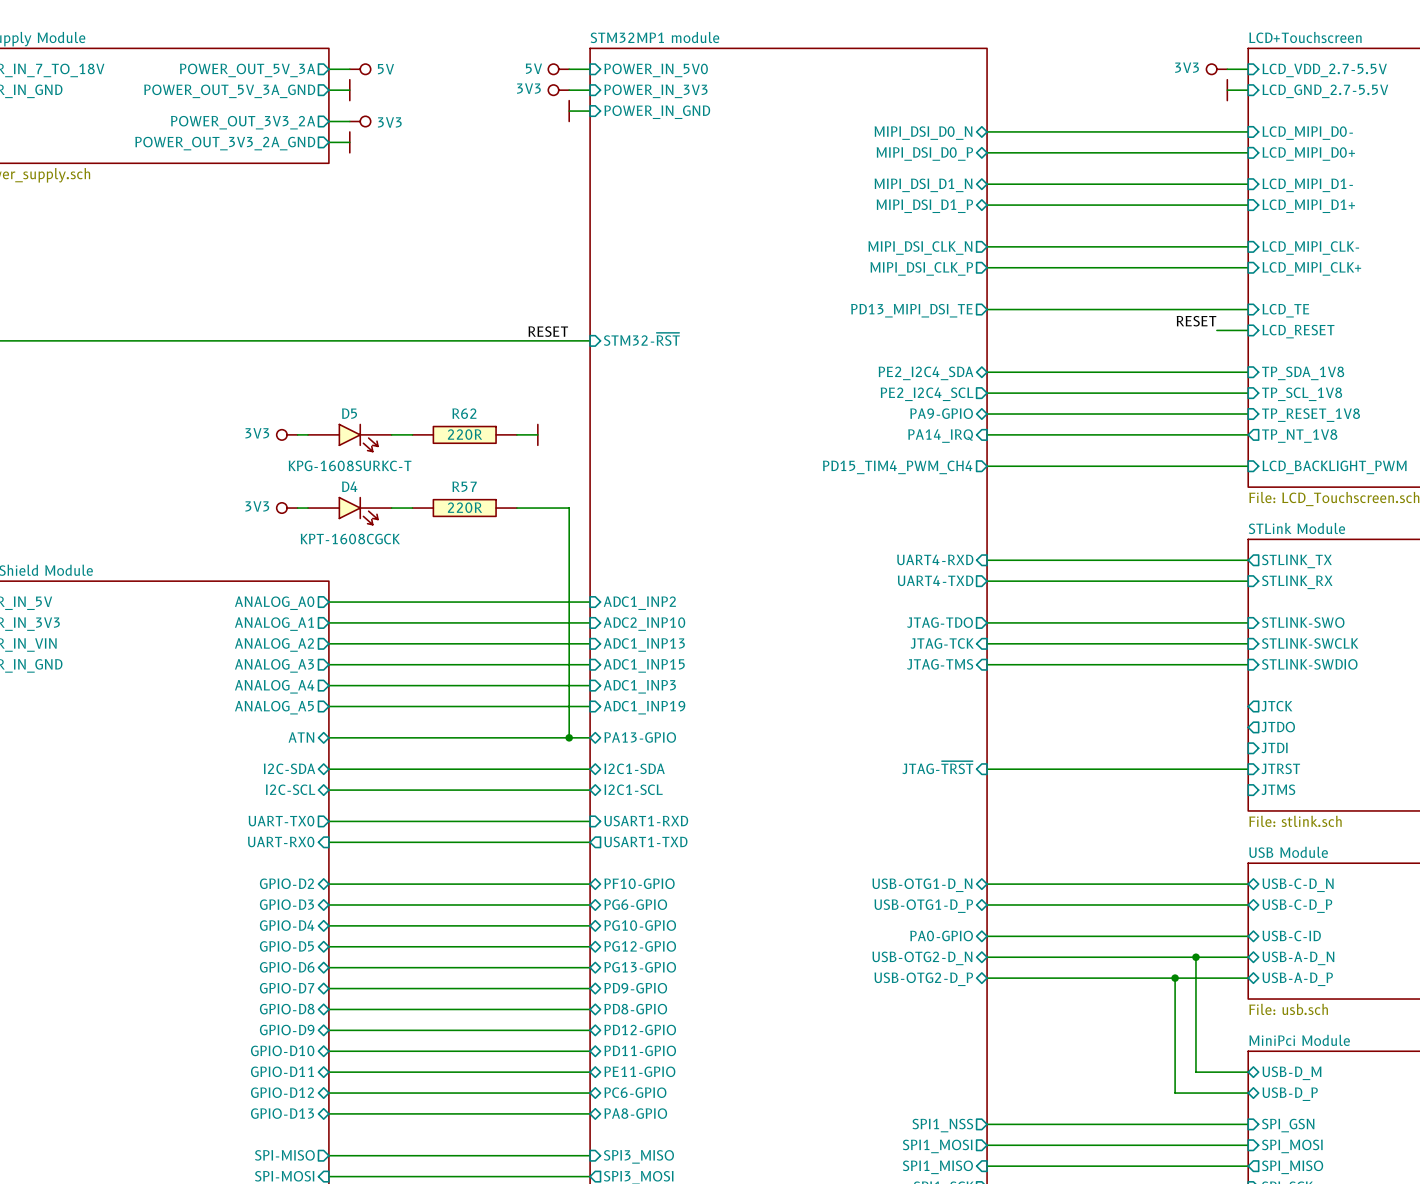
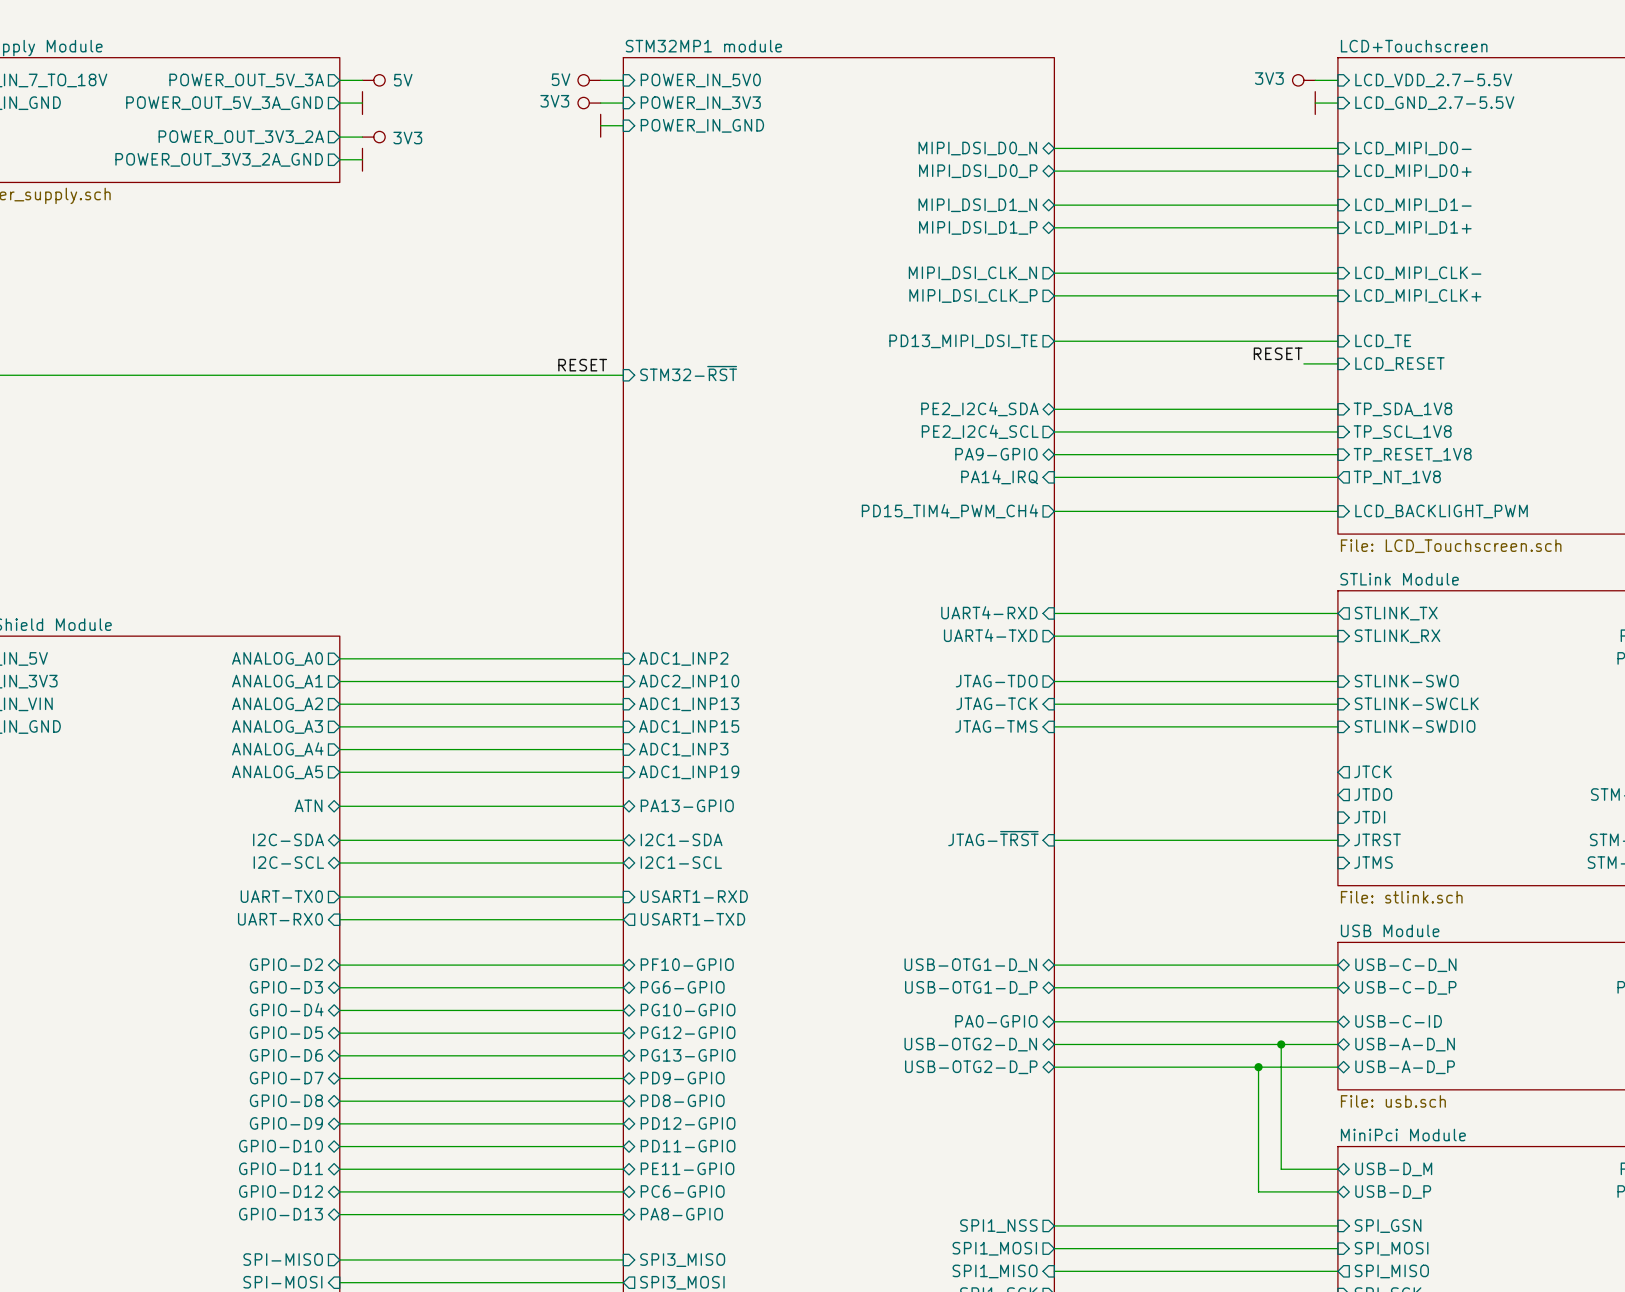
power symbol: 3V3 (287, 434) -> none
wire: (297, 434) (308, 434) -> none
wire: (391, 434) (412, 434) -> none
R62: 220R (464, 434) -> none
wire: (516, 434) (537, 434) -> none
power symbol: (537, 434) -> none
D5: KPG-1608SURKC-T (349, 438) -> none
power symbol: 3V3 (287, 508) -> none
wire: (297, 508) (308, 508) -> none
wire: (391, 508) (412, 508) -> none
R57: 220R (464, 508) -> none
wire: (516, 508) (569, 508) (569, 737) -> none
D4: KPT-1608CGCK (349, 511) -> none
junction: (569, 737) -> none

